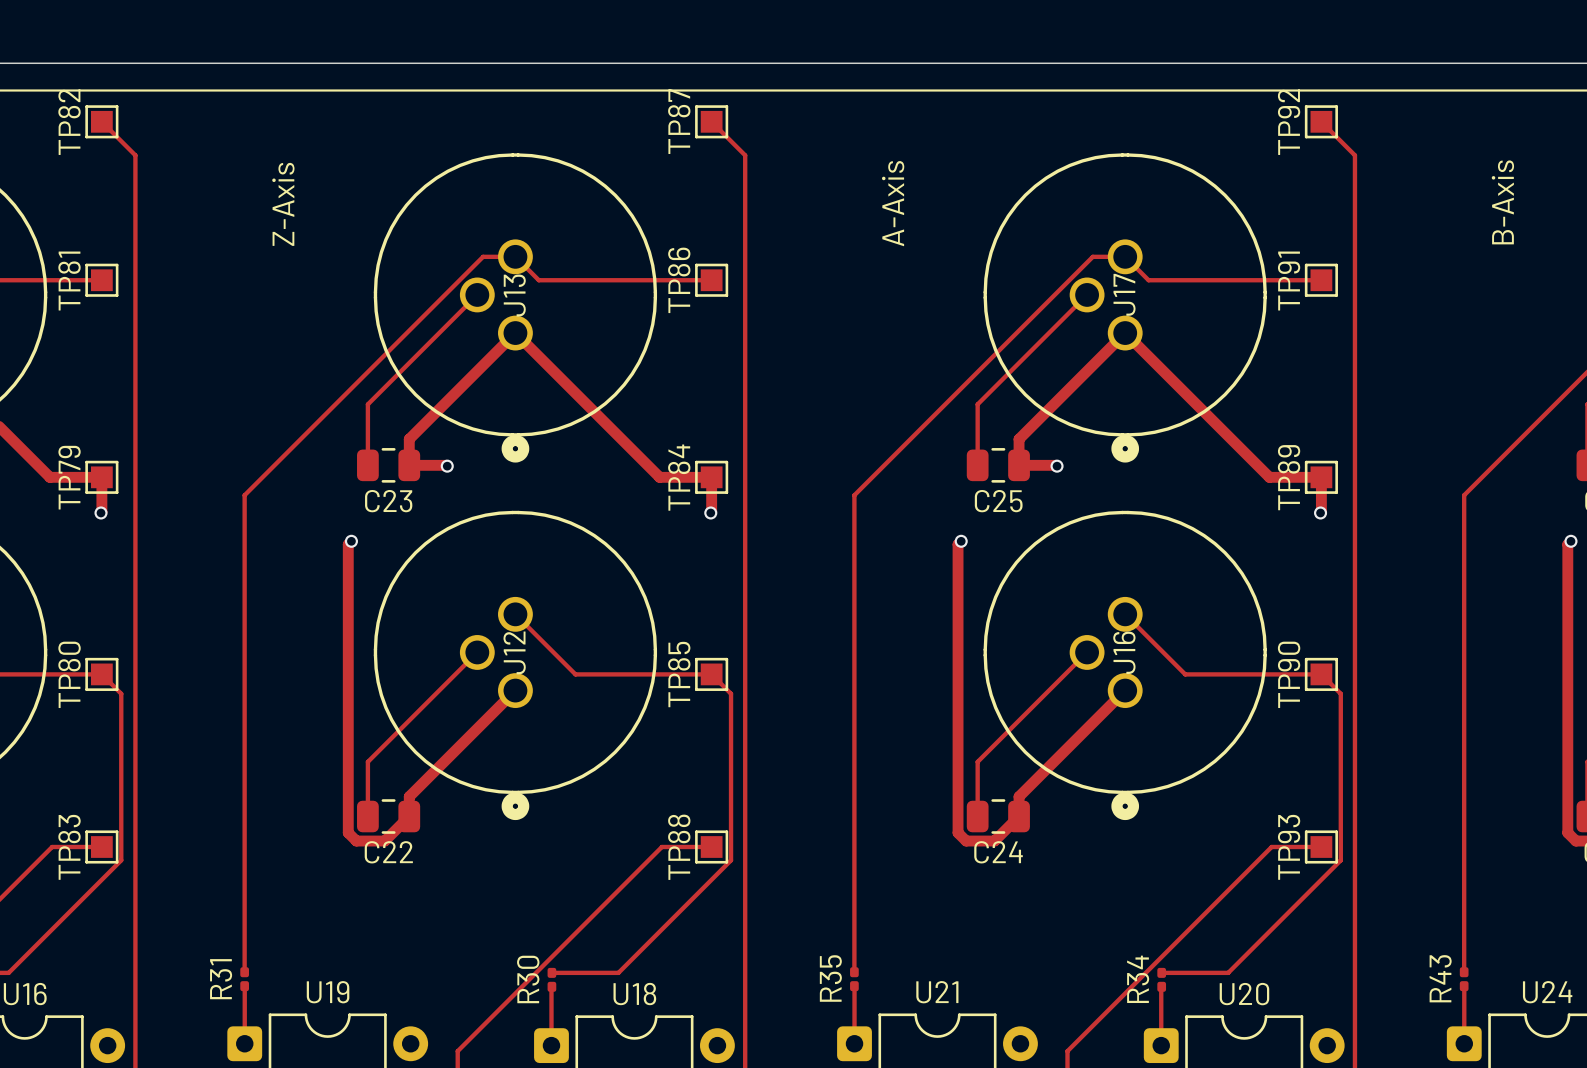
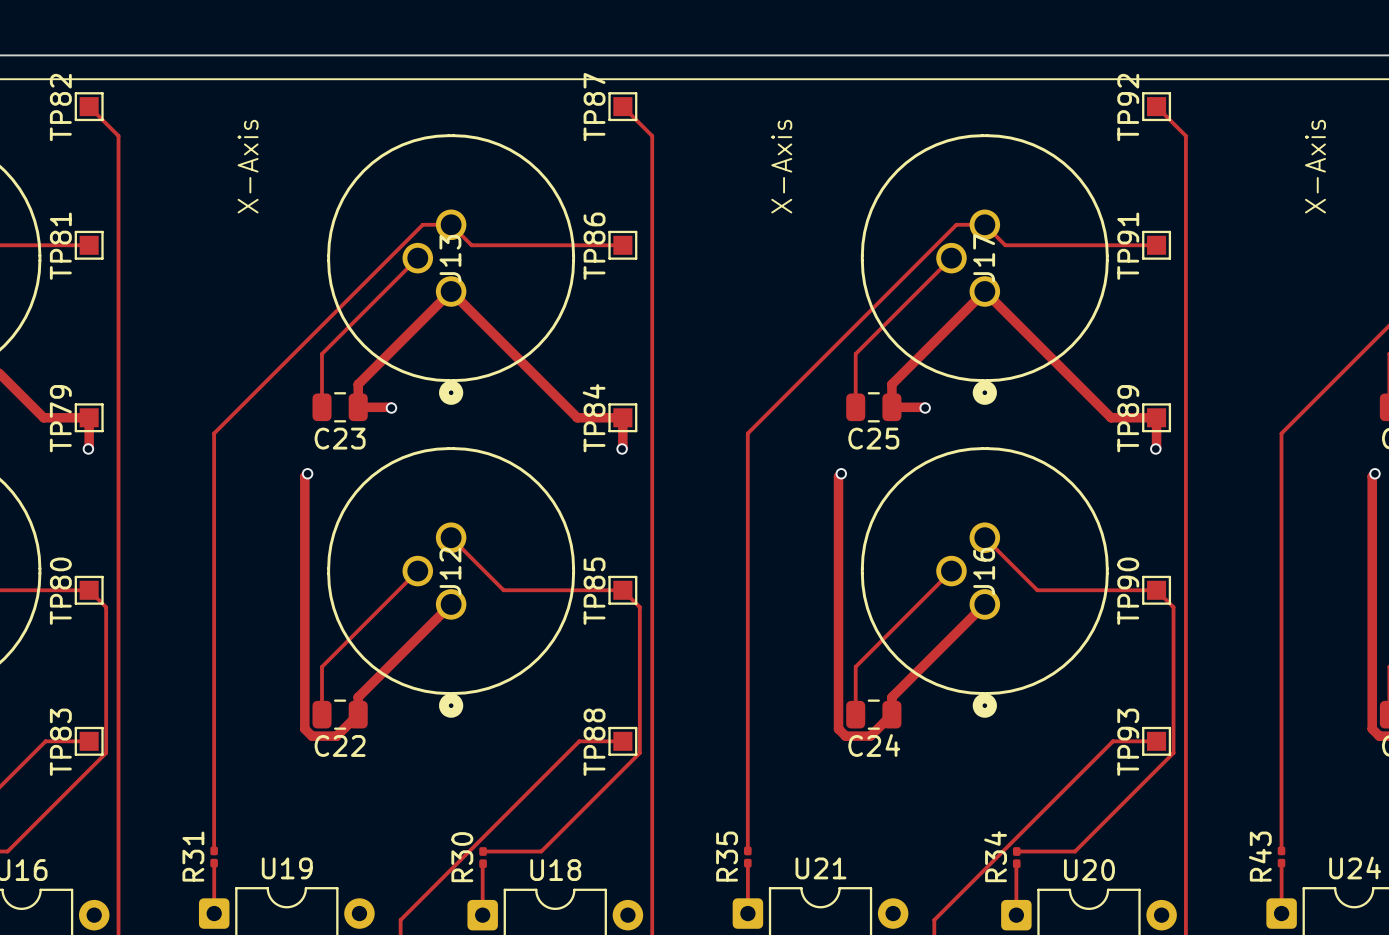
text: B-Axis (1502, 202) -> X-Axis (1315, 166)
text: A-Axis (893, 203) -> X-Axis (781, 166)
text: Z-Axis (283, 204) -> X-Axis (248, 166)

